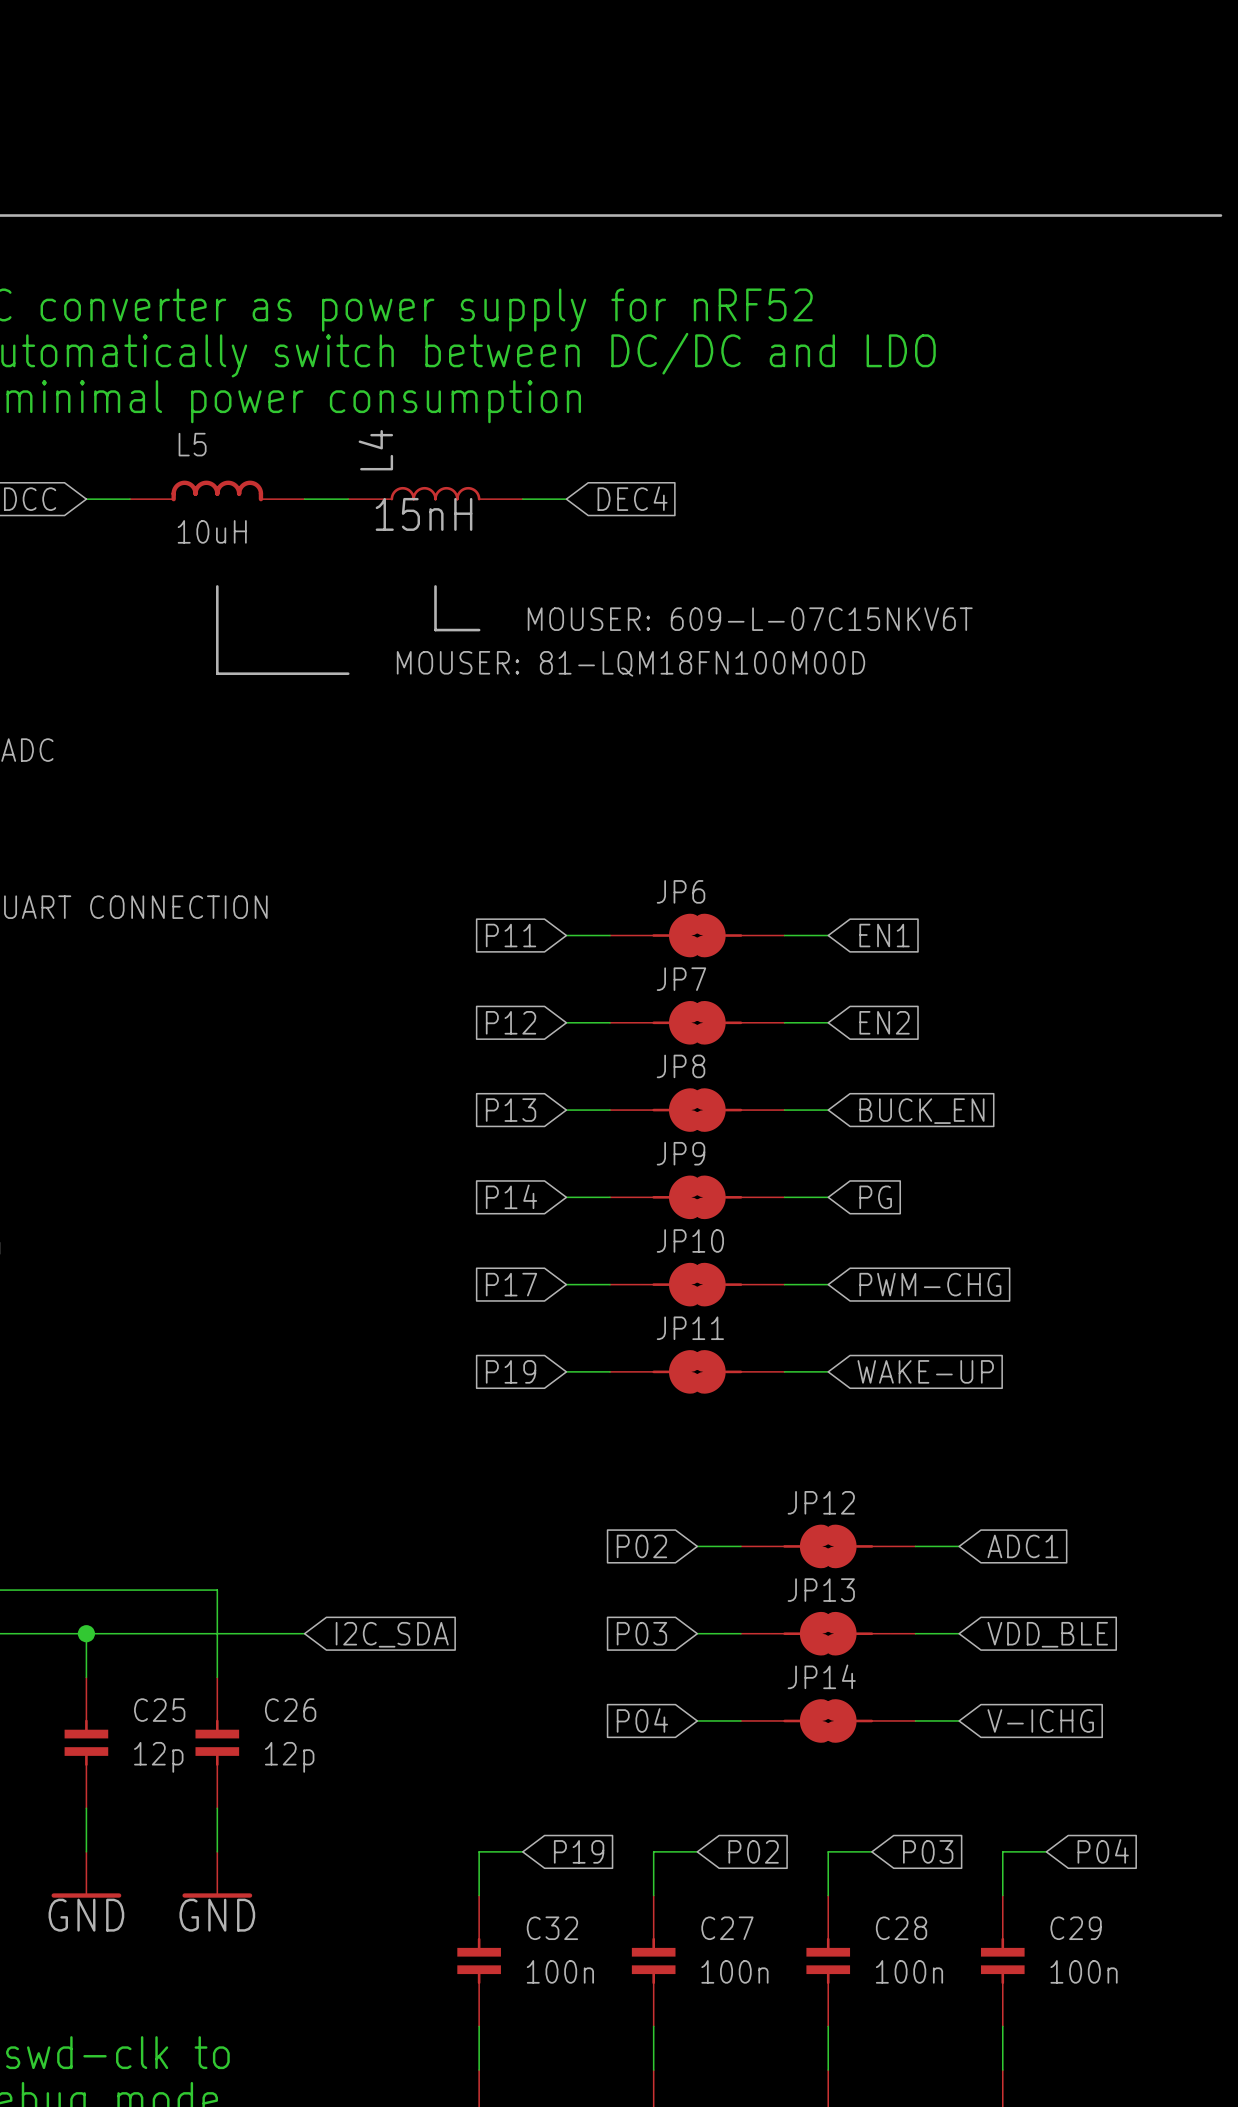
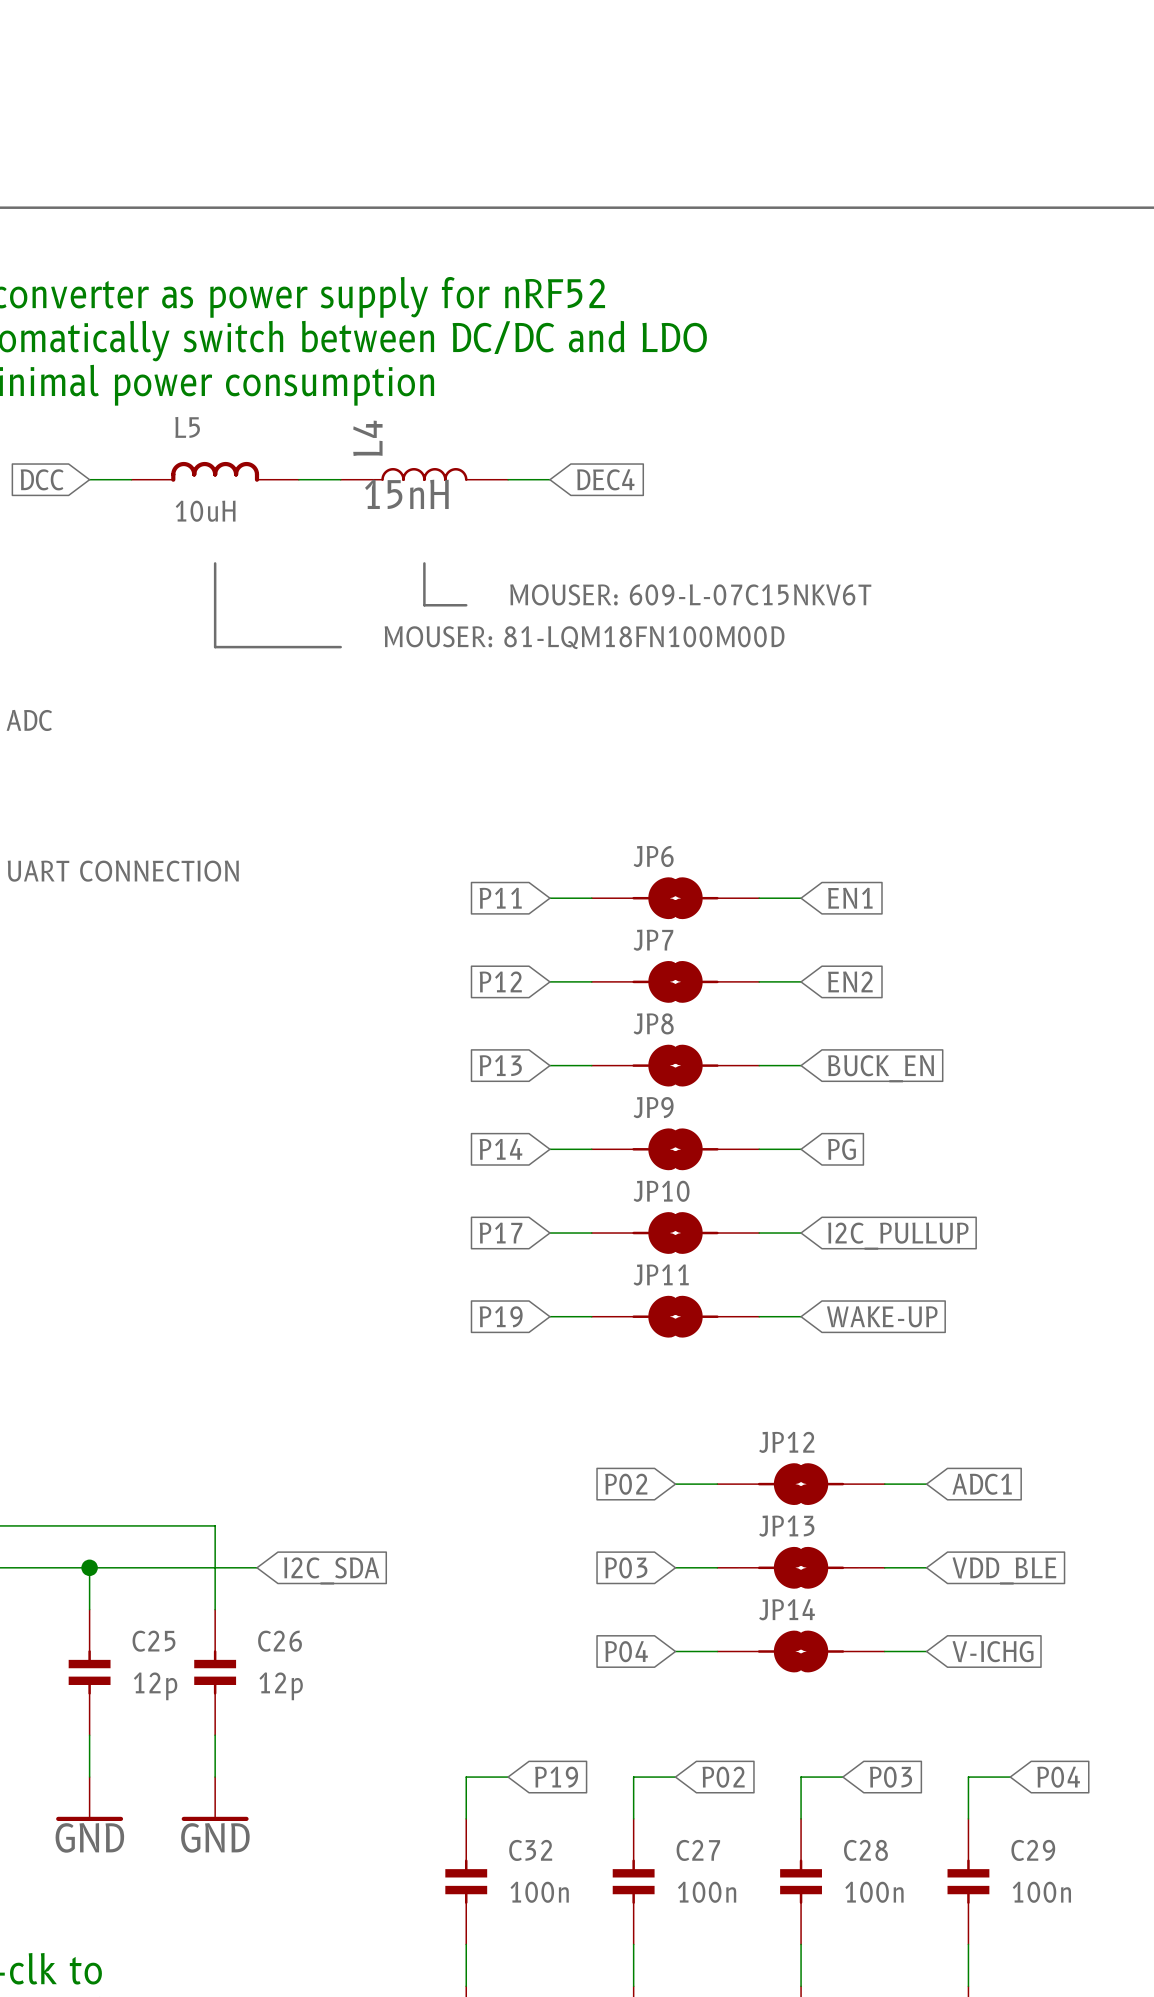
global label: PWM-CHG (930, 1284) -> I2C_PULLUP (898, 1236)
wire: (260, 1633) (304, 1633) -> none
global label position: I2C_SDA (392, 1634) -> I2C_SDA (331, 1570)

